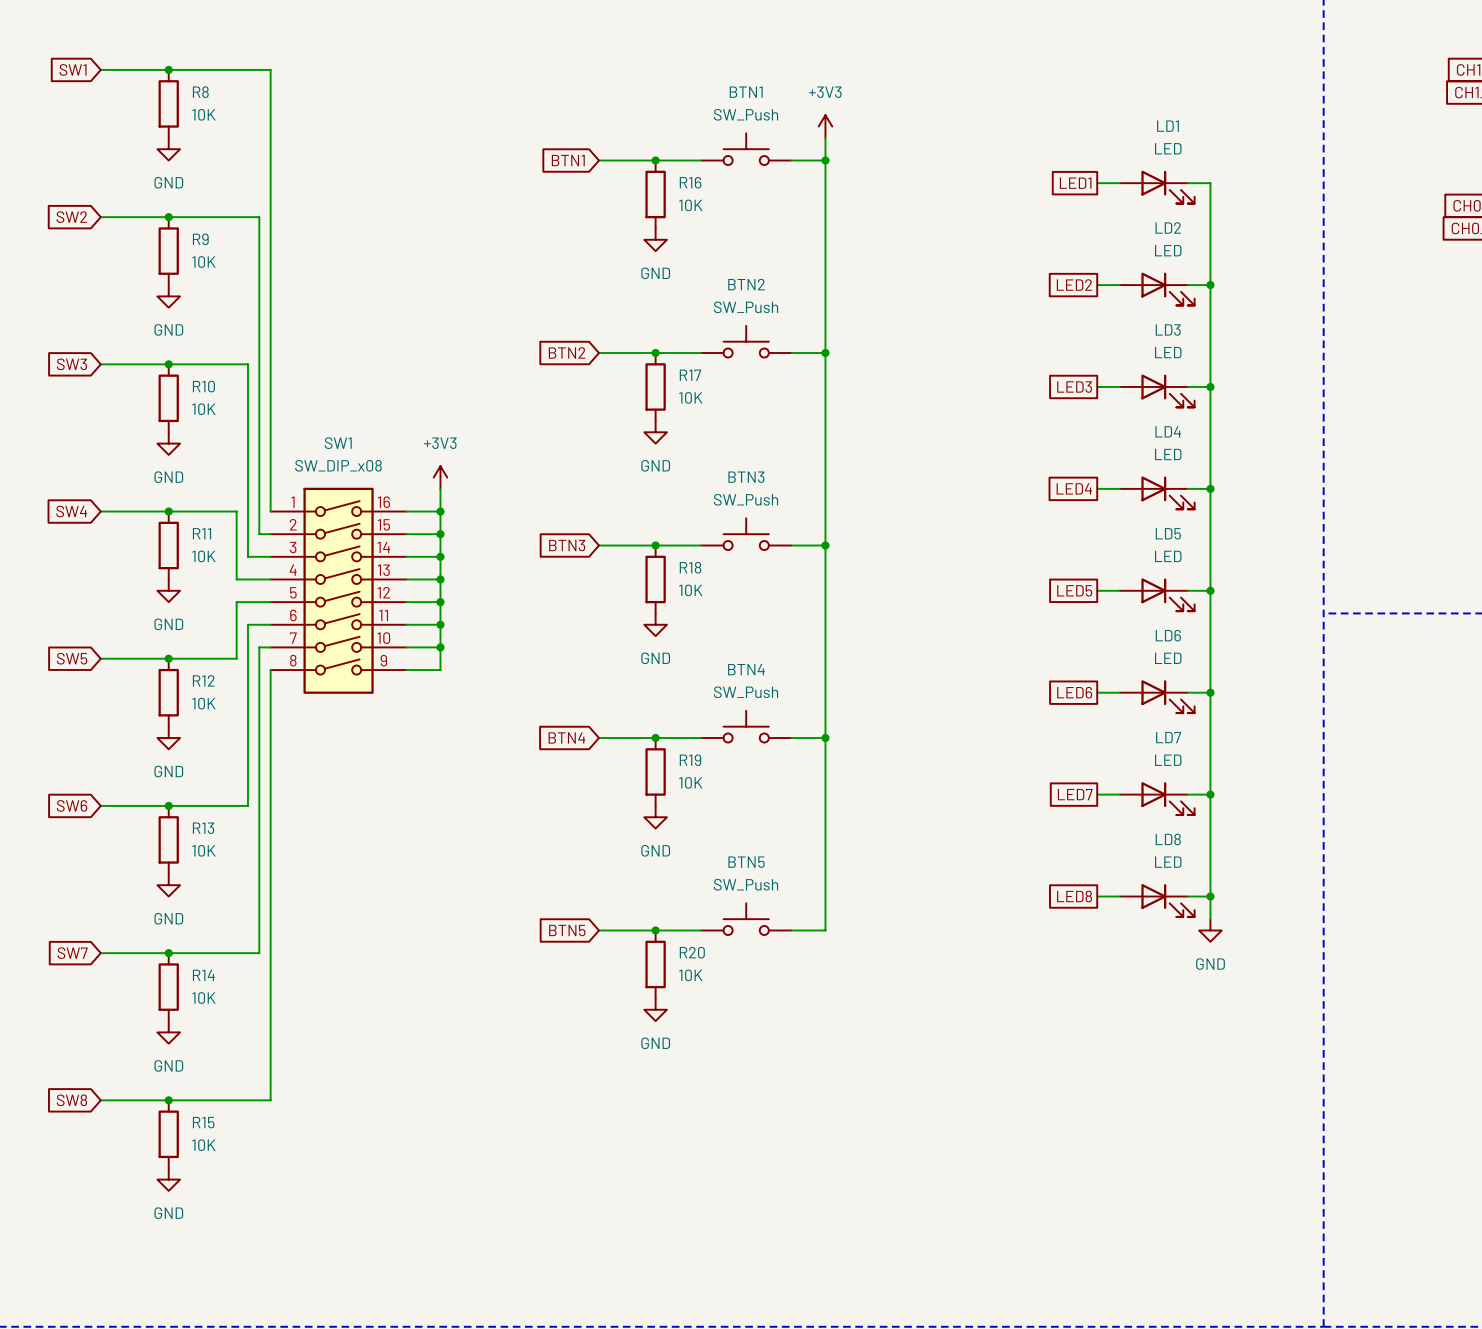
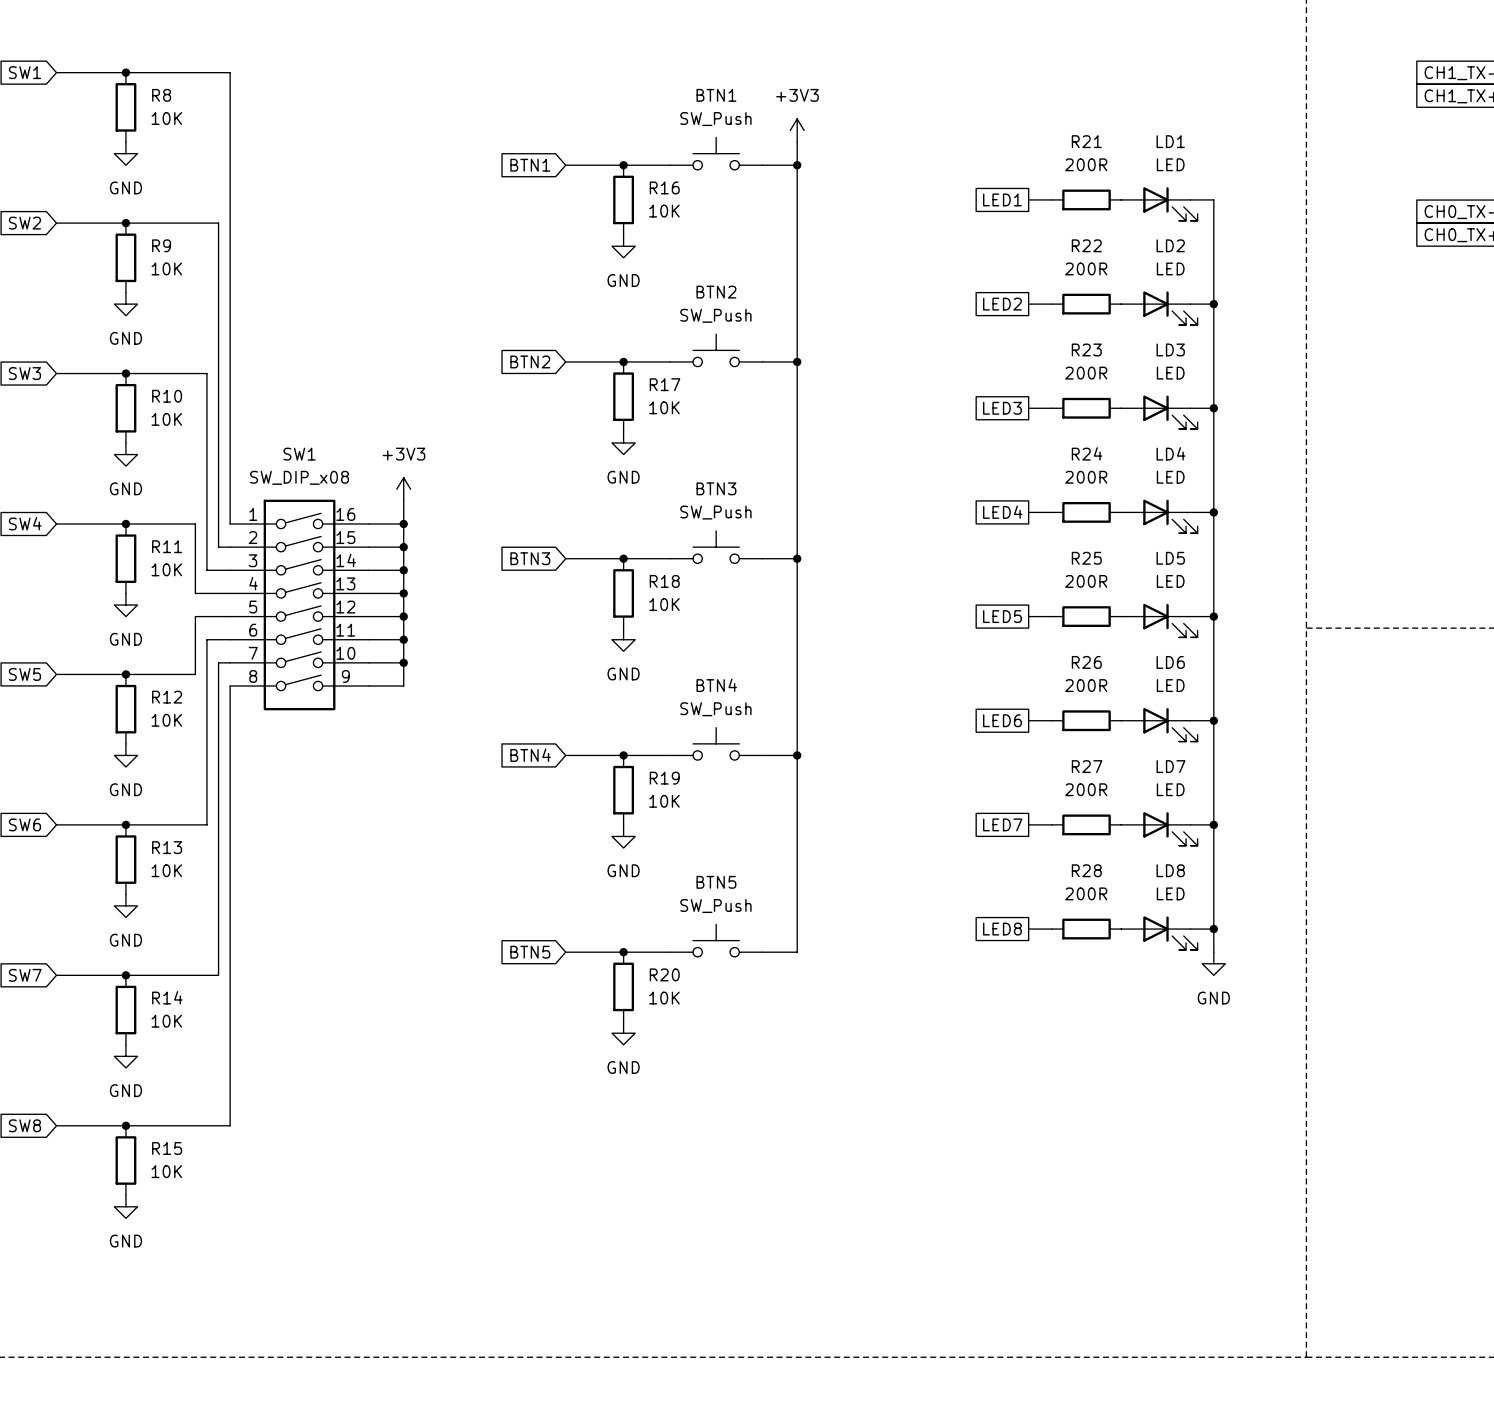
global label position: LED1 (1075, 183) -> LED1 (1002, 199)
wire: (1187, 183) (1210, 183) (1210, 919) -> (1190, 199) (1213, 199) (1213, 952)
LD1 position: (1157, 187) -> (1159, 204)
R21: none -> 200R (1086, 199)
global label position: LED2 (1074, 285) -> LED2 (1002, 304)
wire: (1187, 285) (1210, 285) -> (1190, 304) (1213, 304)
junction position: (1210, 285) -> (1213, 304)
LD2 position: (1157, 289) -> (1159, 308)
R22: none -> 200R (1086, 304)
wire: (1187, 386) (1210, 386) -> (1190, 408) (1213, 408)
junction position: (1210, 386) -> (1213, 408)
global label position: LED3 (1074, 387) -> LED3 (1002, 408)
LD3 position: (1157, 390) -> (1159, 412)
R23: none -> 200R (1086, 408)
global label position: LED4 (1074, 488) -> LED4 (1002, 512)
wire: (1187, 488) (1210, 488) -> (1190, 512) (1213, 512)
junction position: (1210, 488) -> (1213, 512)
LD4 position: (1157, 492) -> (1159, 516)
R24: none -> 200R (1086, 512)
global label position: LED5 (1074, 590) -> LED5 (1002, 616)
wire: (1187, 590) (1210, 590) -> (1190, 616) (1213, 616)
junction position: (1210, 590) -> (1213, 616)
LD5 position: (1157, 594) -> (1159, 620)
R25: none -> 200R (1086, 616)
global label position: LED6 (1074, 692) -> LED6 (1002, 720)
wire: (1187, 692) (1210, 692) -> (1190, 720) (1213, 720)
junction position: (1210, 692) -> (1213, 720)
LD6 position: (1157, 696) -> (1159, 724)
R26: none -> 200R (1086, 720)
global label position: LED7 (1075, 794) -> LED7 (1002, 824)
wire: (1187, 794) (1210, 794) -> (1190, 824) (1213, 824)
junction position: (1210, 794) -> (1213, 824)
LD7 position: (1157, 798) -> (1159, 828)
R27: none -> 200R (1086, 824)
global label position: LED8 (1074, 896) -> LED8 (1002, 929)
wire: (1187, 896) (1210, 896) -> (1190, 929) (1213, 929)
junction position: (1210, 896) -> (1213, 929)
LD8 position: (1157, 900) -> (1159, 933)
R28: none -> 200R (1086, 929)
power symbol position: GND (1210, 930) -> GND (1213, 963)

